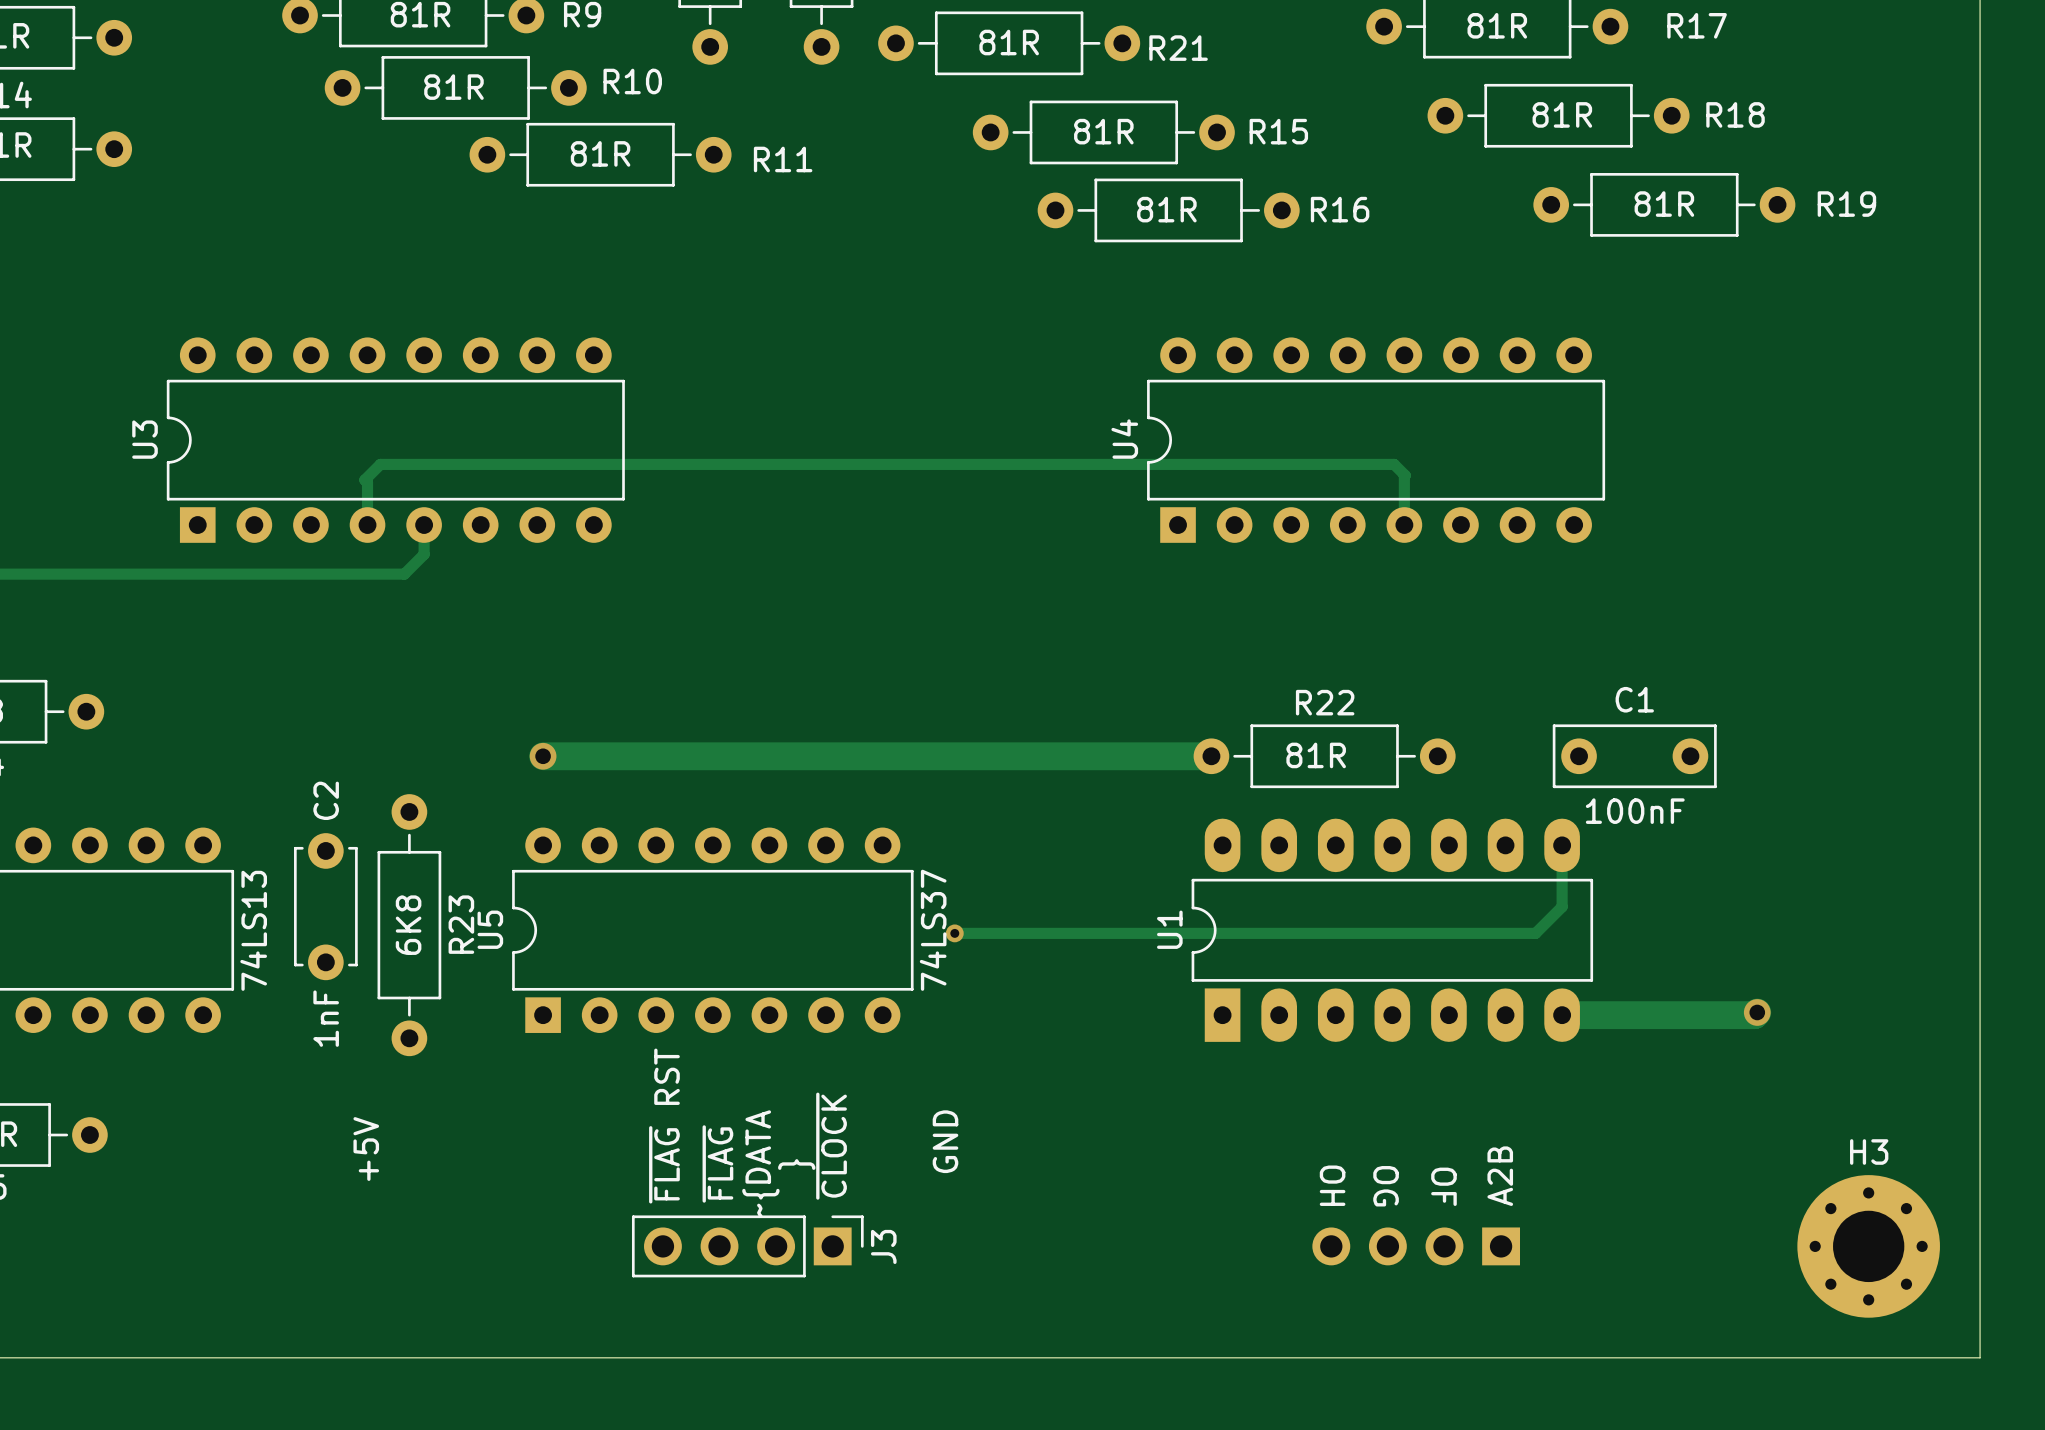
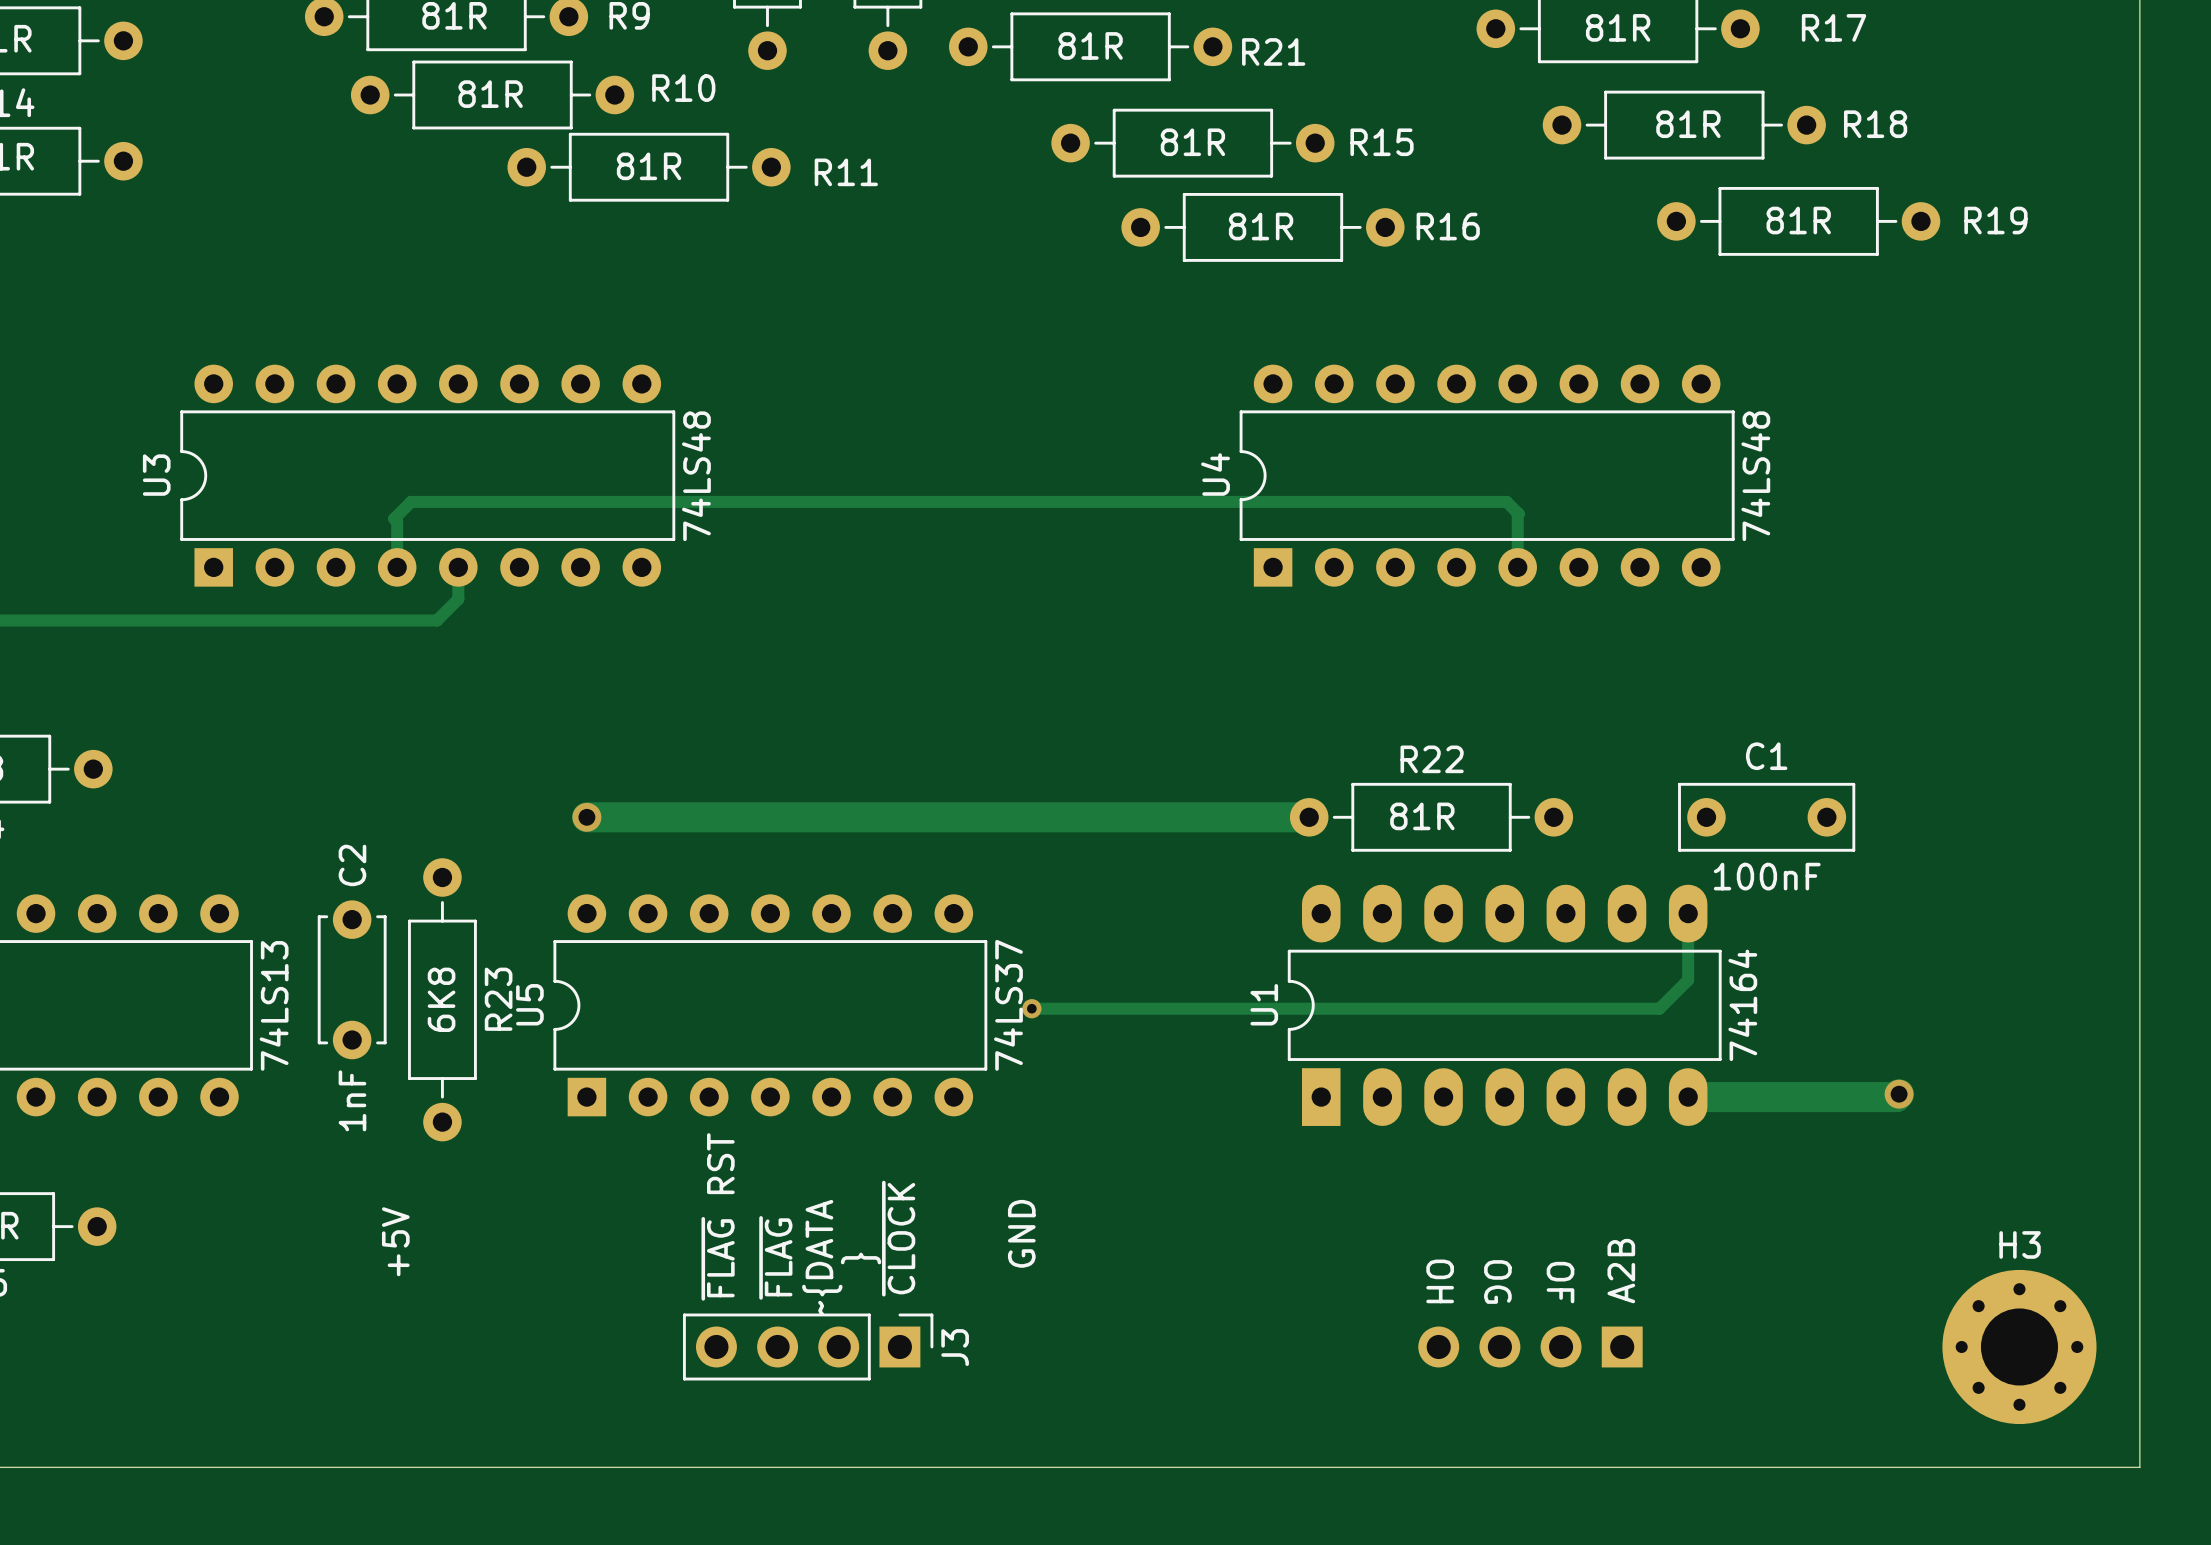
U3 value: none -> 74LS48 (696, 476)
U4 value: none -> 74LS48 (1755, 476)
U1 value: none -> 74164 (1742, 1005)

